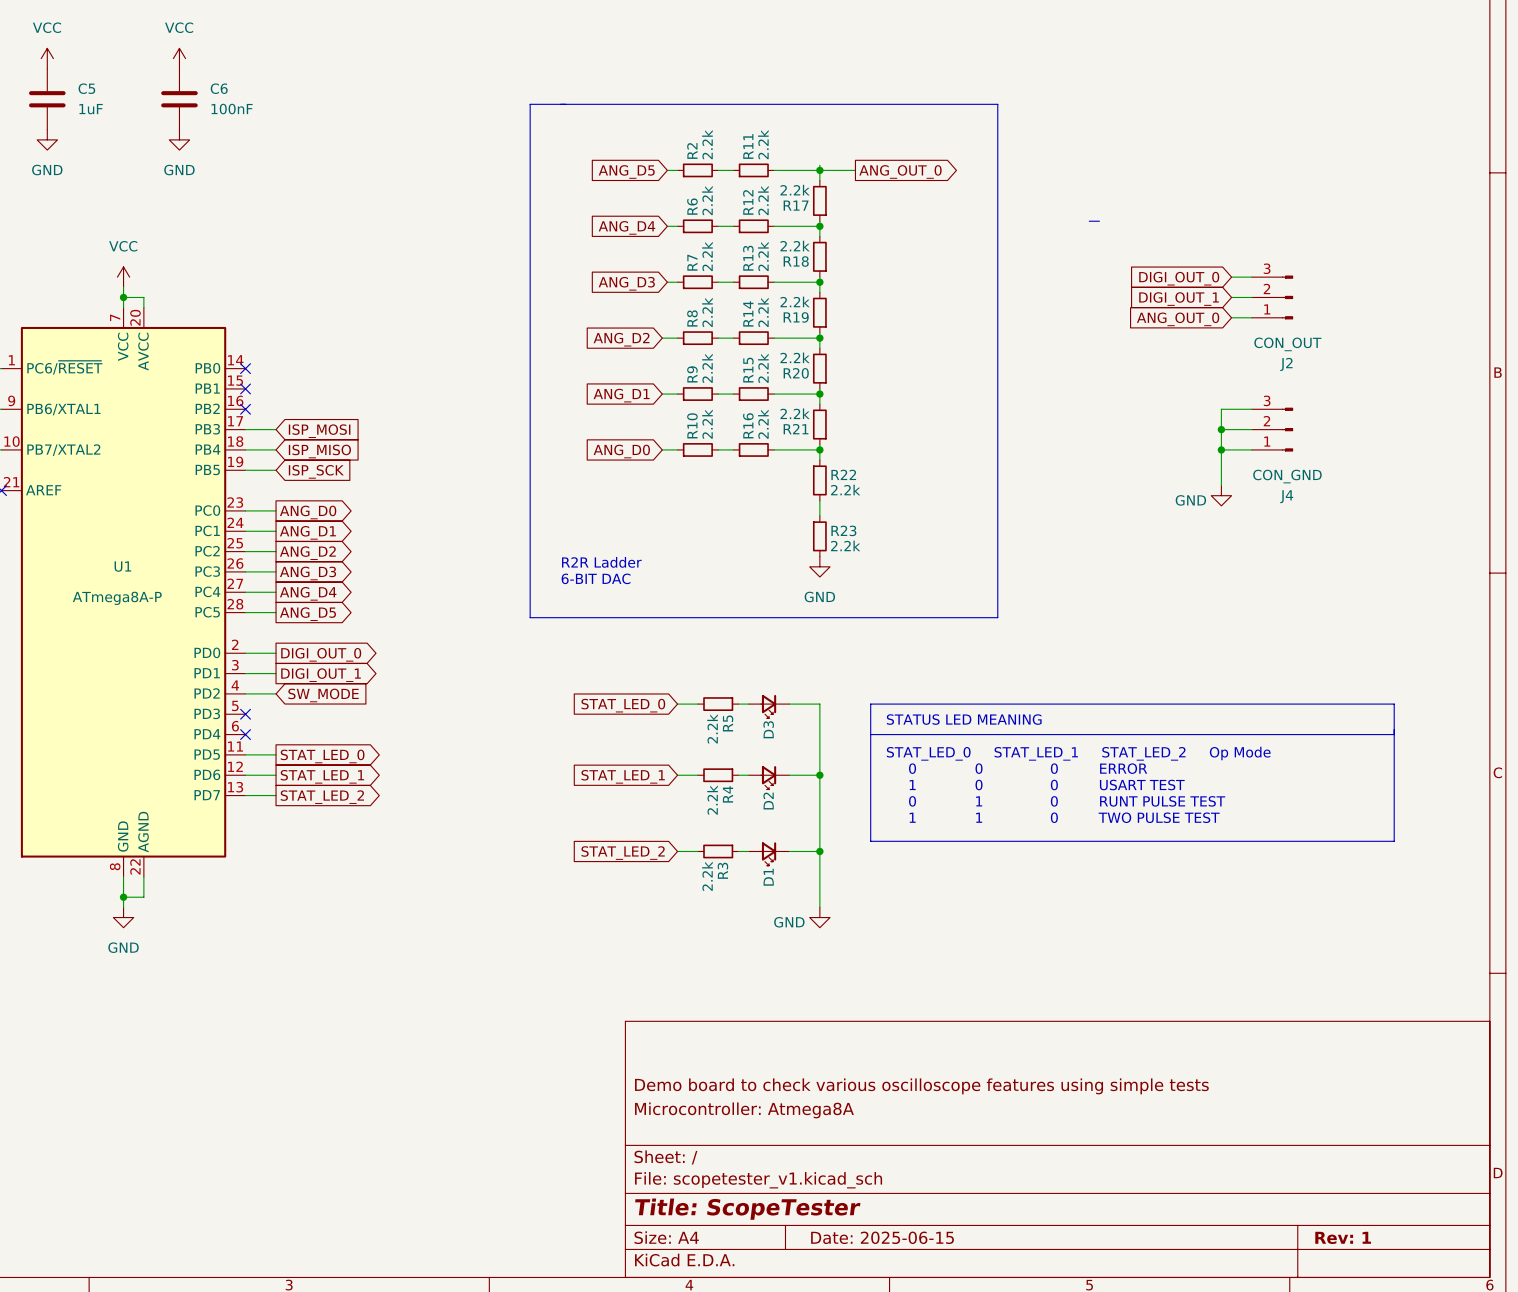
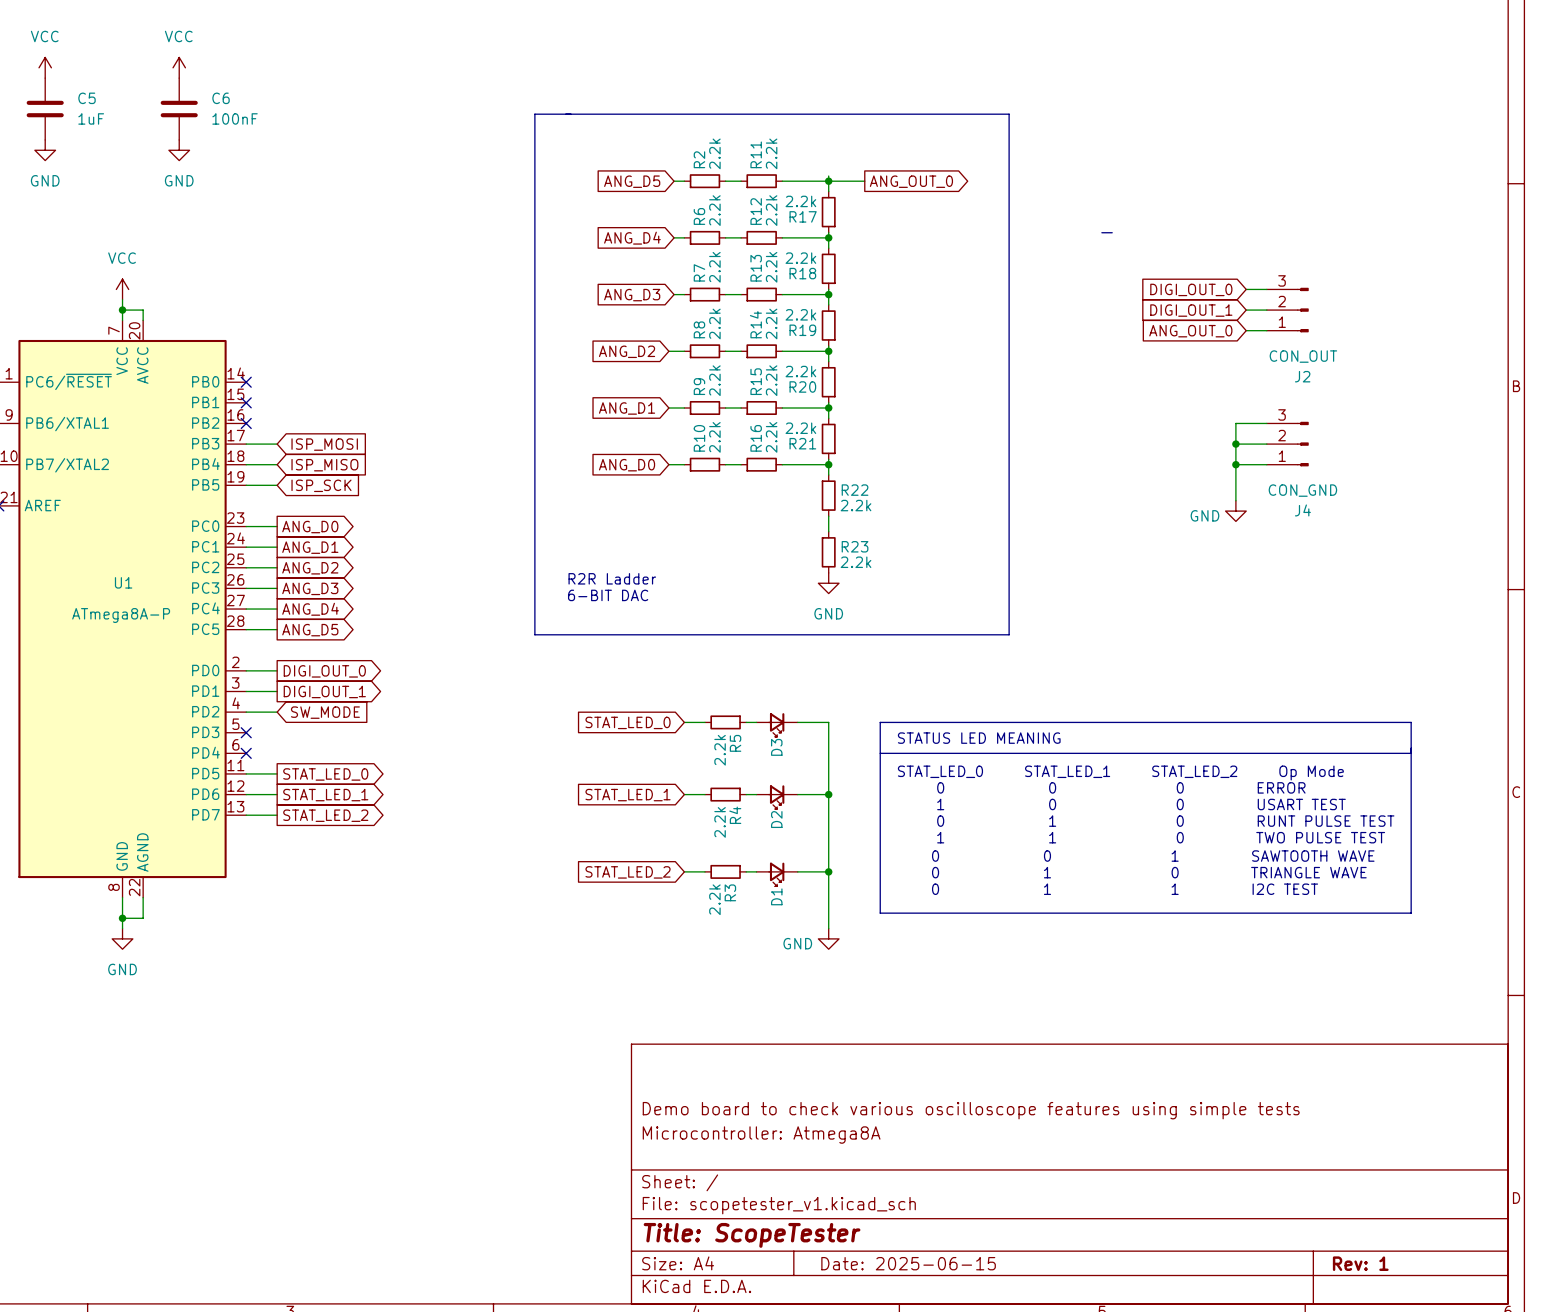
text: none -> 0 0 1 SAWTOOTH WAVE (1153, 856)
line: (870, 841) (1394, 841) -> (880, 861) (880, 913) (1411, 913) (1411, 861)
text: none -> 0 1 0 TRIANGLE WAVE (1149, 872)
text: none -> 0 1 1 I2C TEST (1125, 889)

